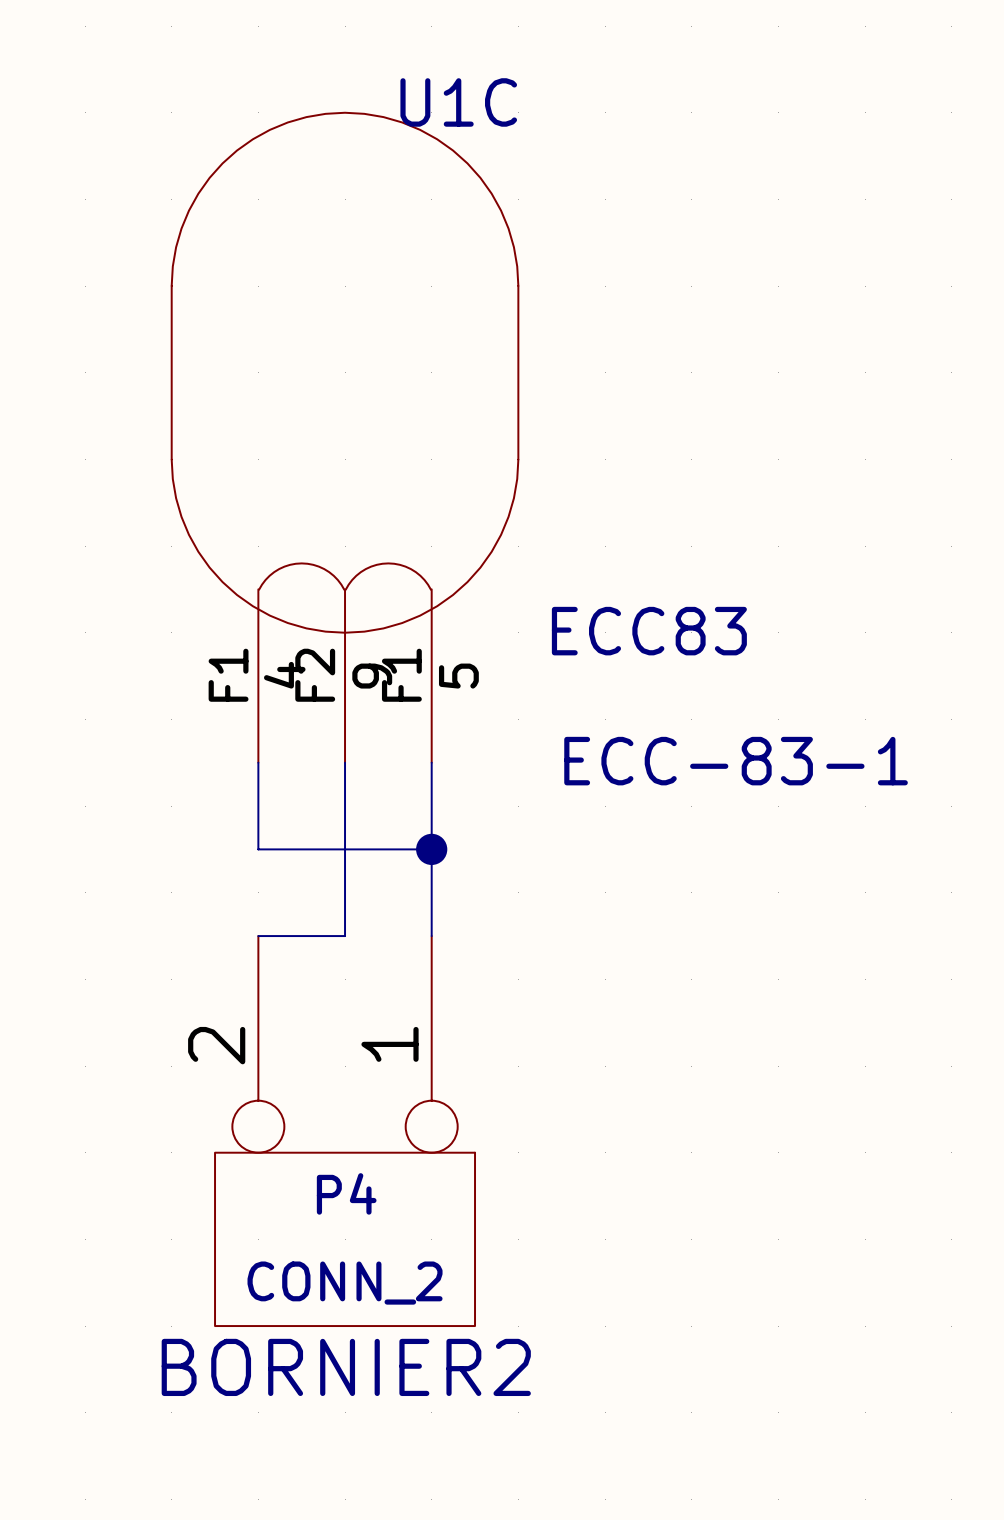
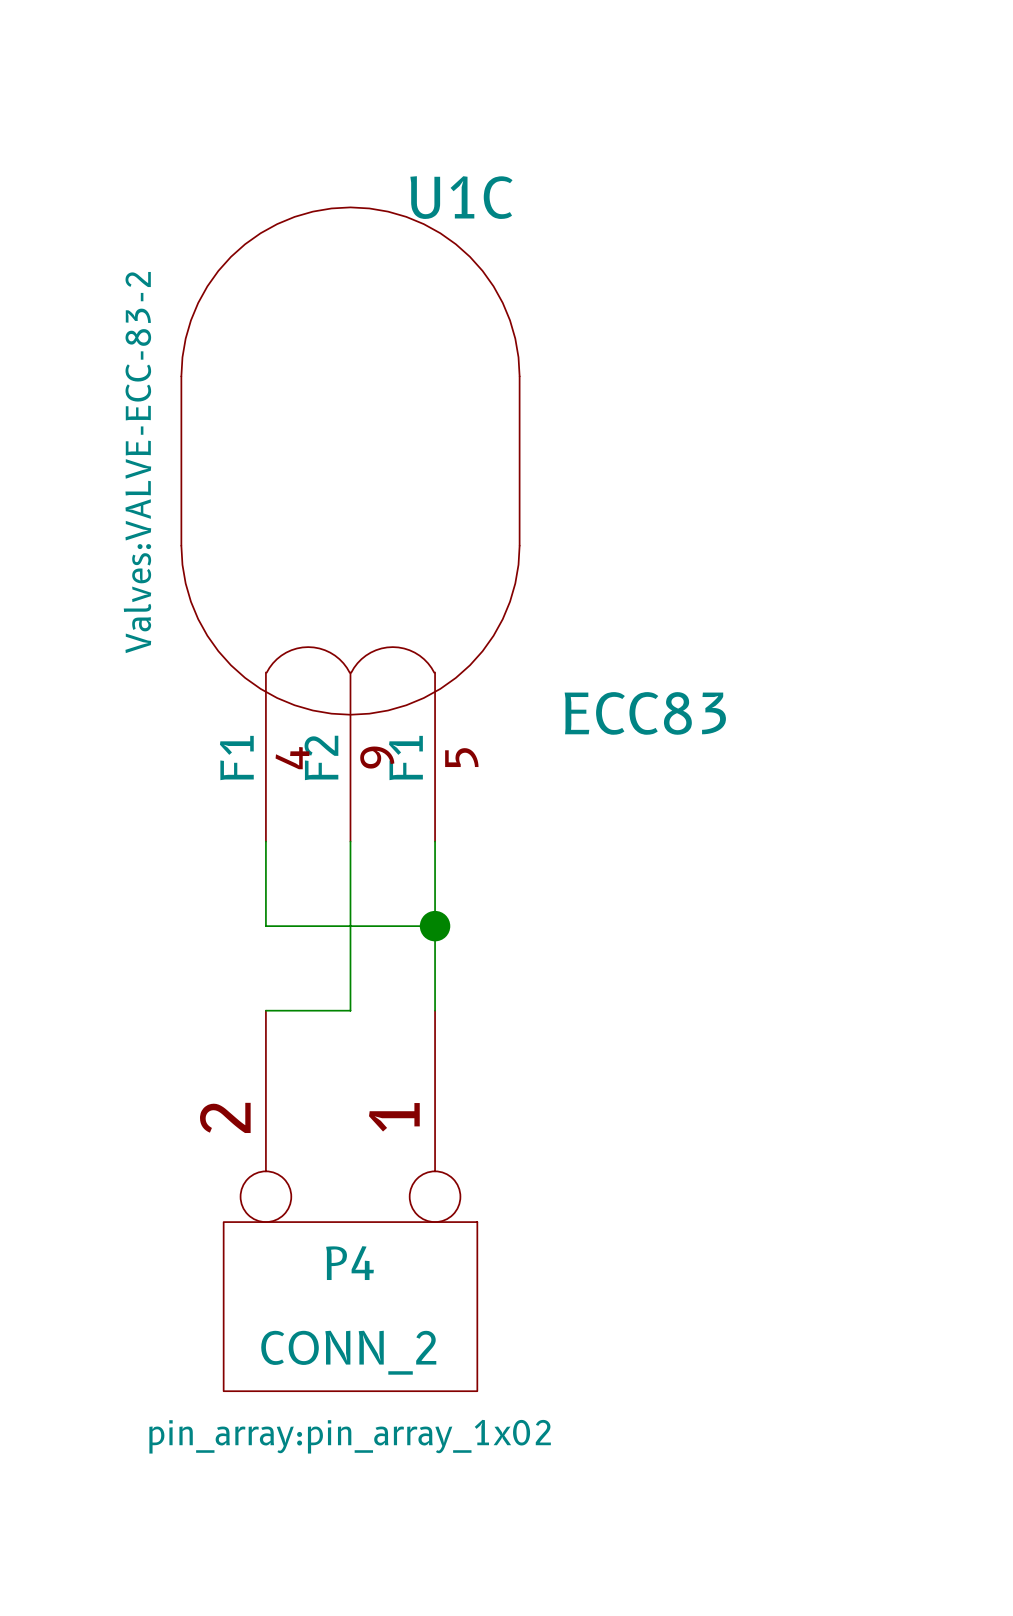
U1C text: ECC-83-1 (736, 761) -> Valves:VALVE-ECC-83-2 (137, 462)
P4 text: BORNIER2 (346, 1367) -> pin_array:pin_array_1x02 (350, 1436)

